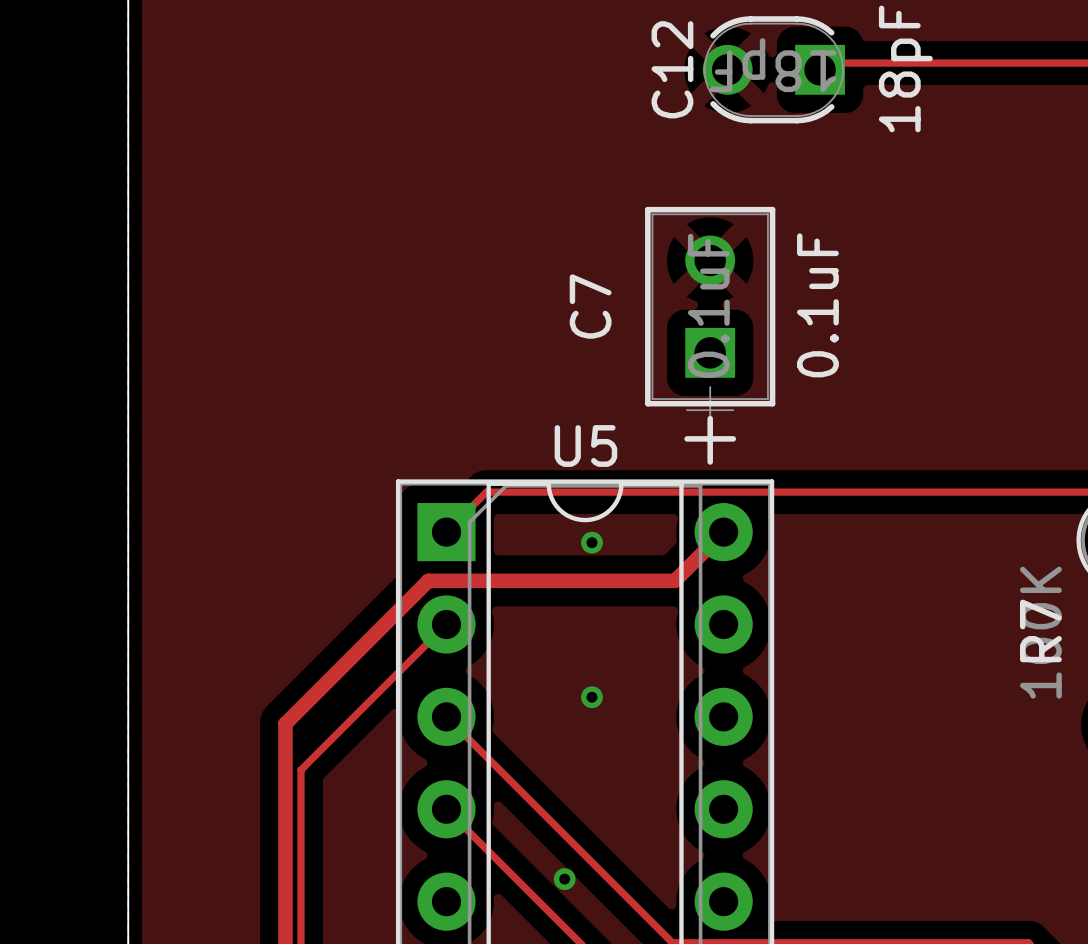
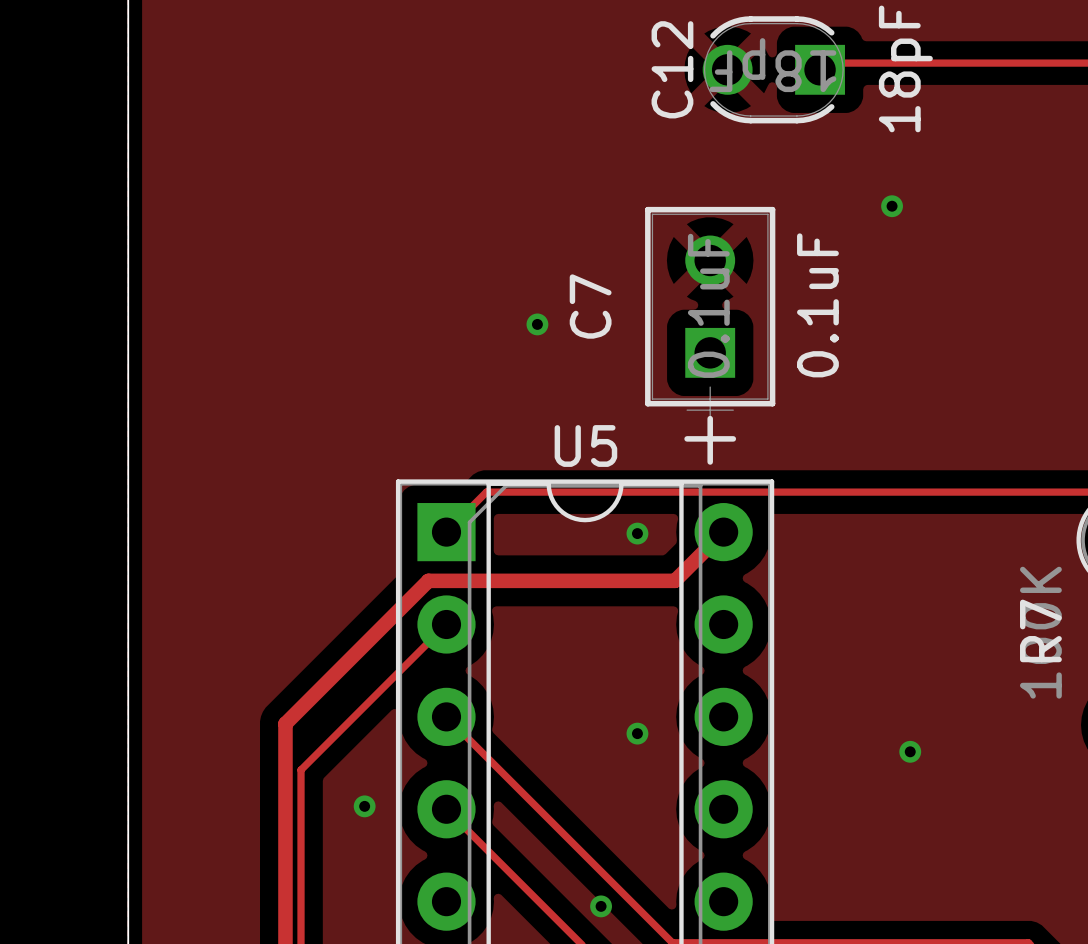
via: none -> (892, 206)
via: none -> (537, 324)
via position: (591, 542) -> (637, 533)
via position: (591, 697) -> (637, 733)
via: none -> (910, 751)
via: none -> (364, 806)
via position: (564, 879) -> (601, 906)

